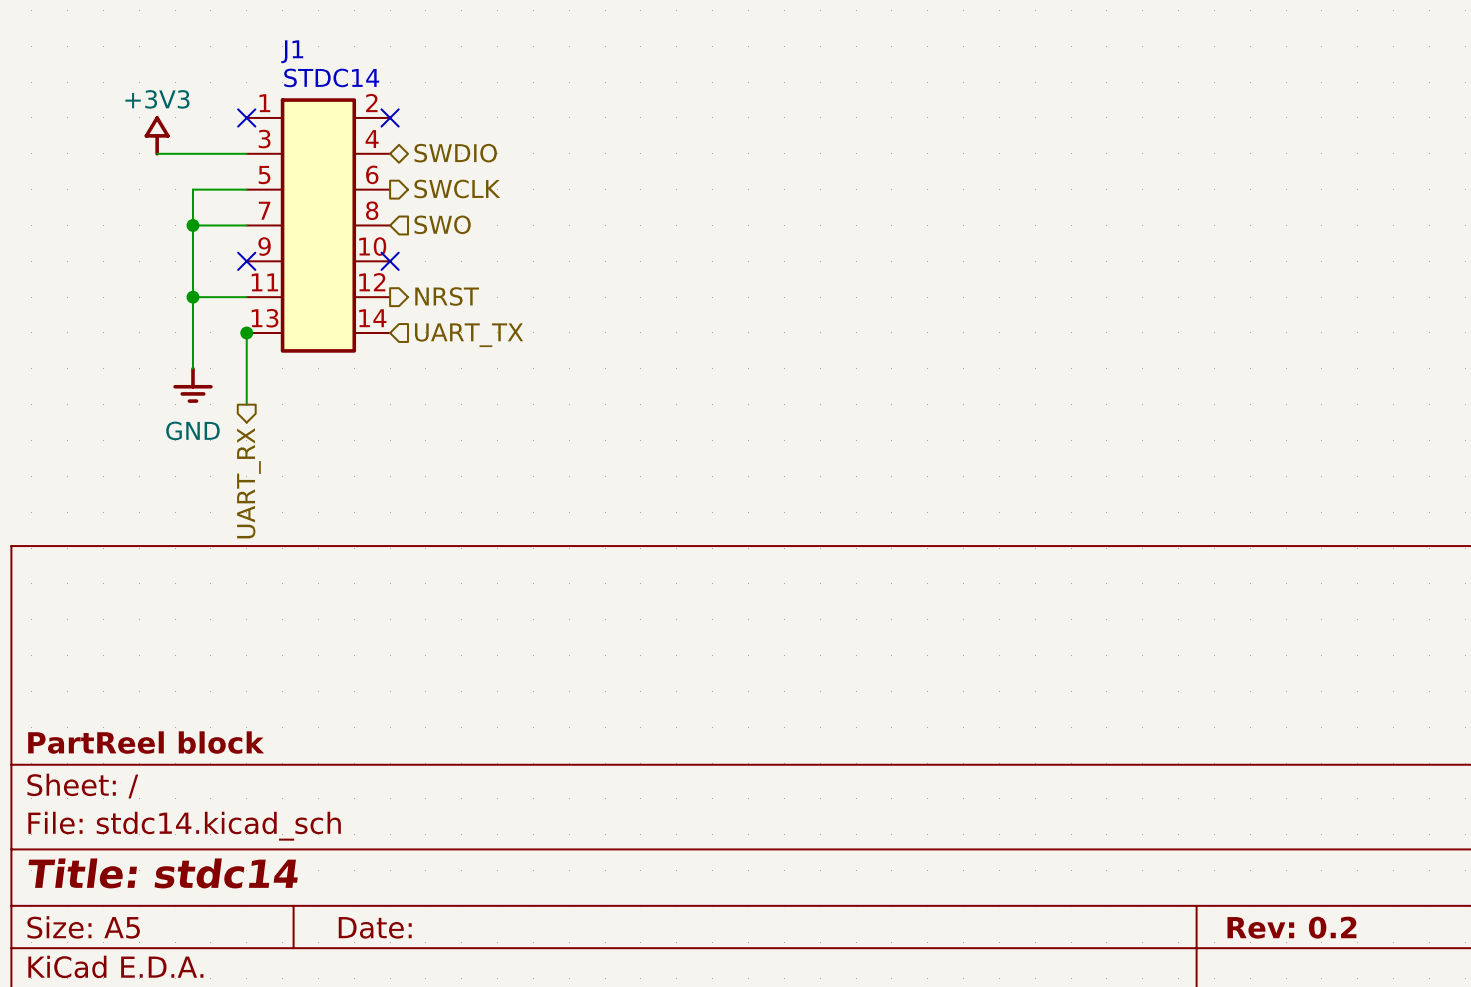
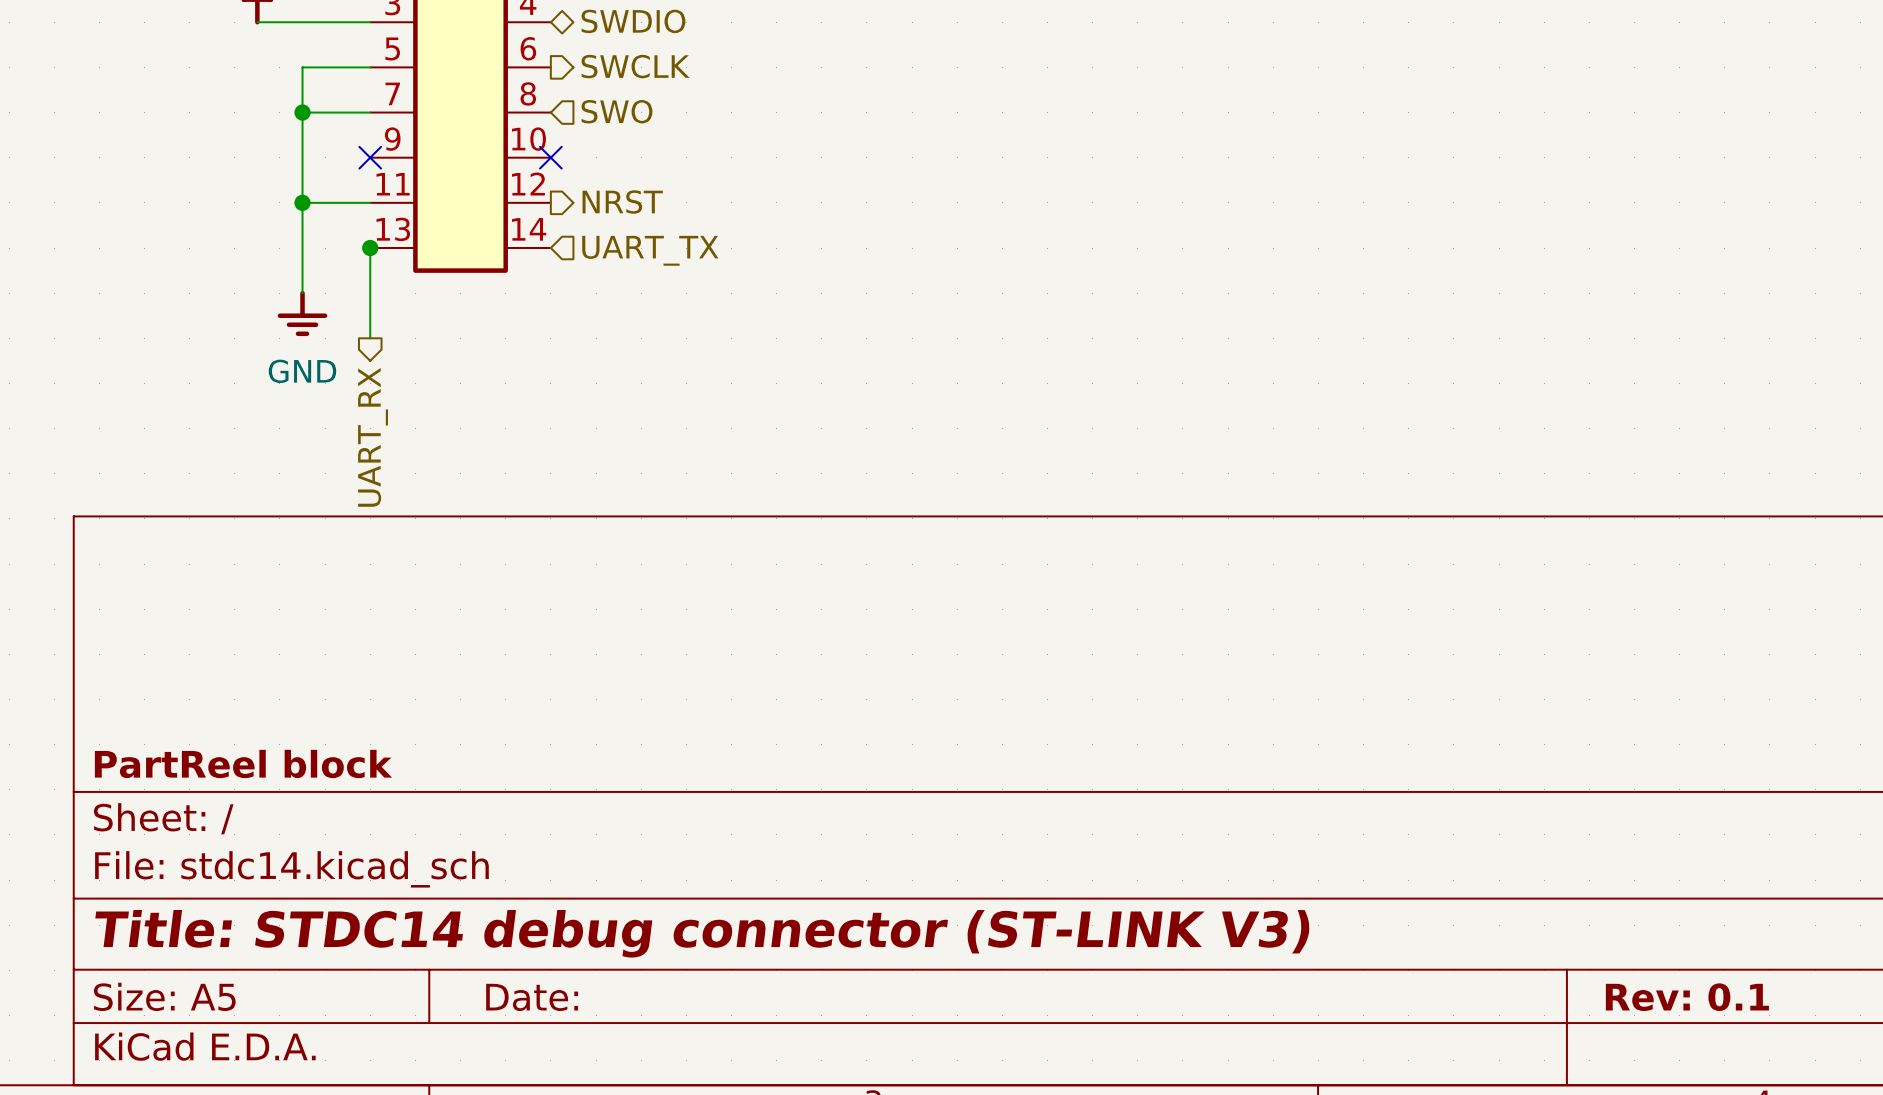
title block: Title: stdc14 (163, 873) -> Title: STDC14 debug connector (ST-LINK V3) (702, 933)
title block: Rev: 0.2 (1291, 927) -> Rev: 0.1 (1687, 997)

